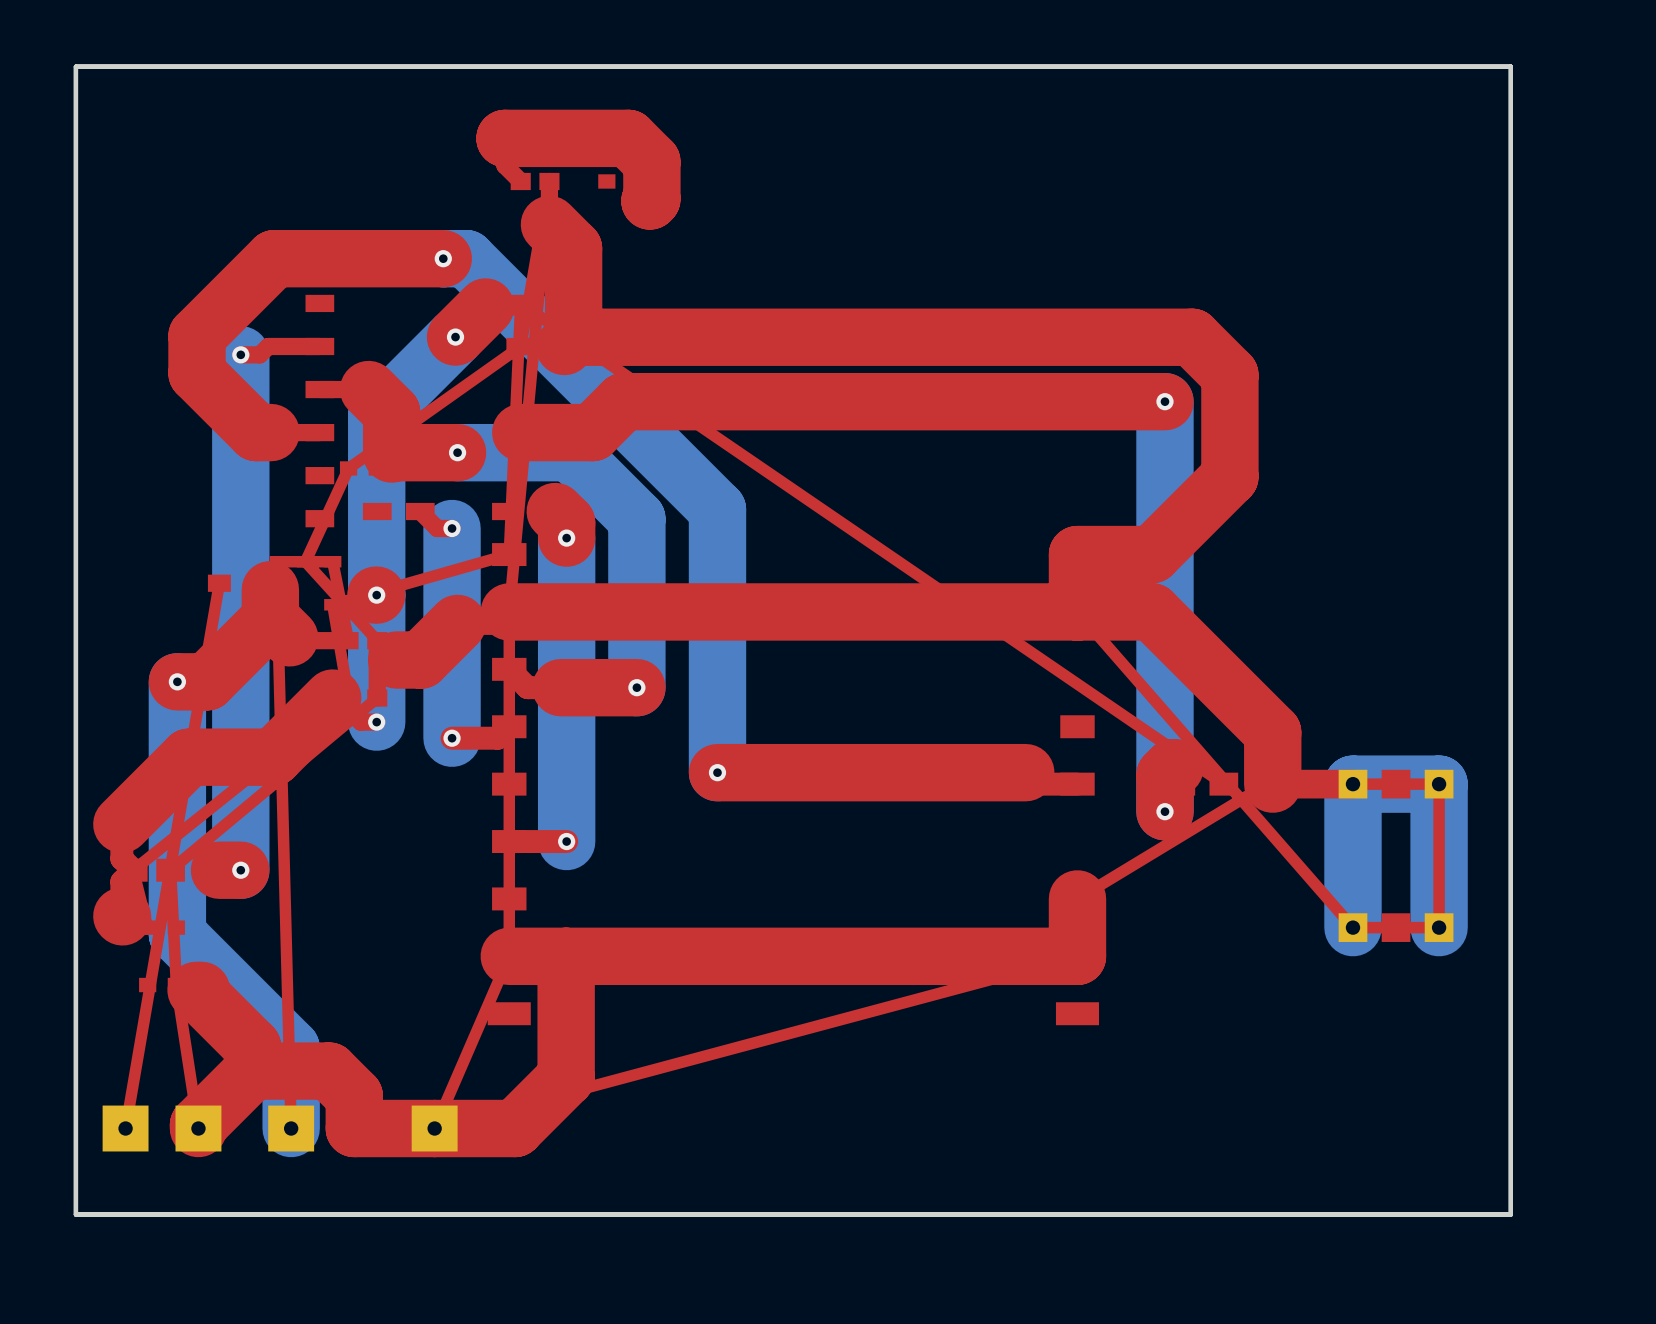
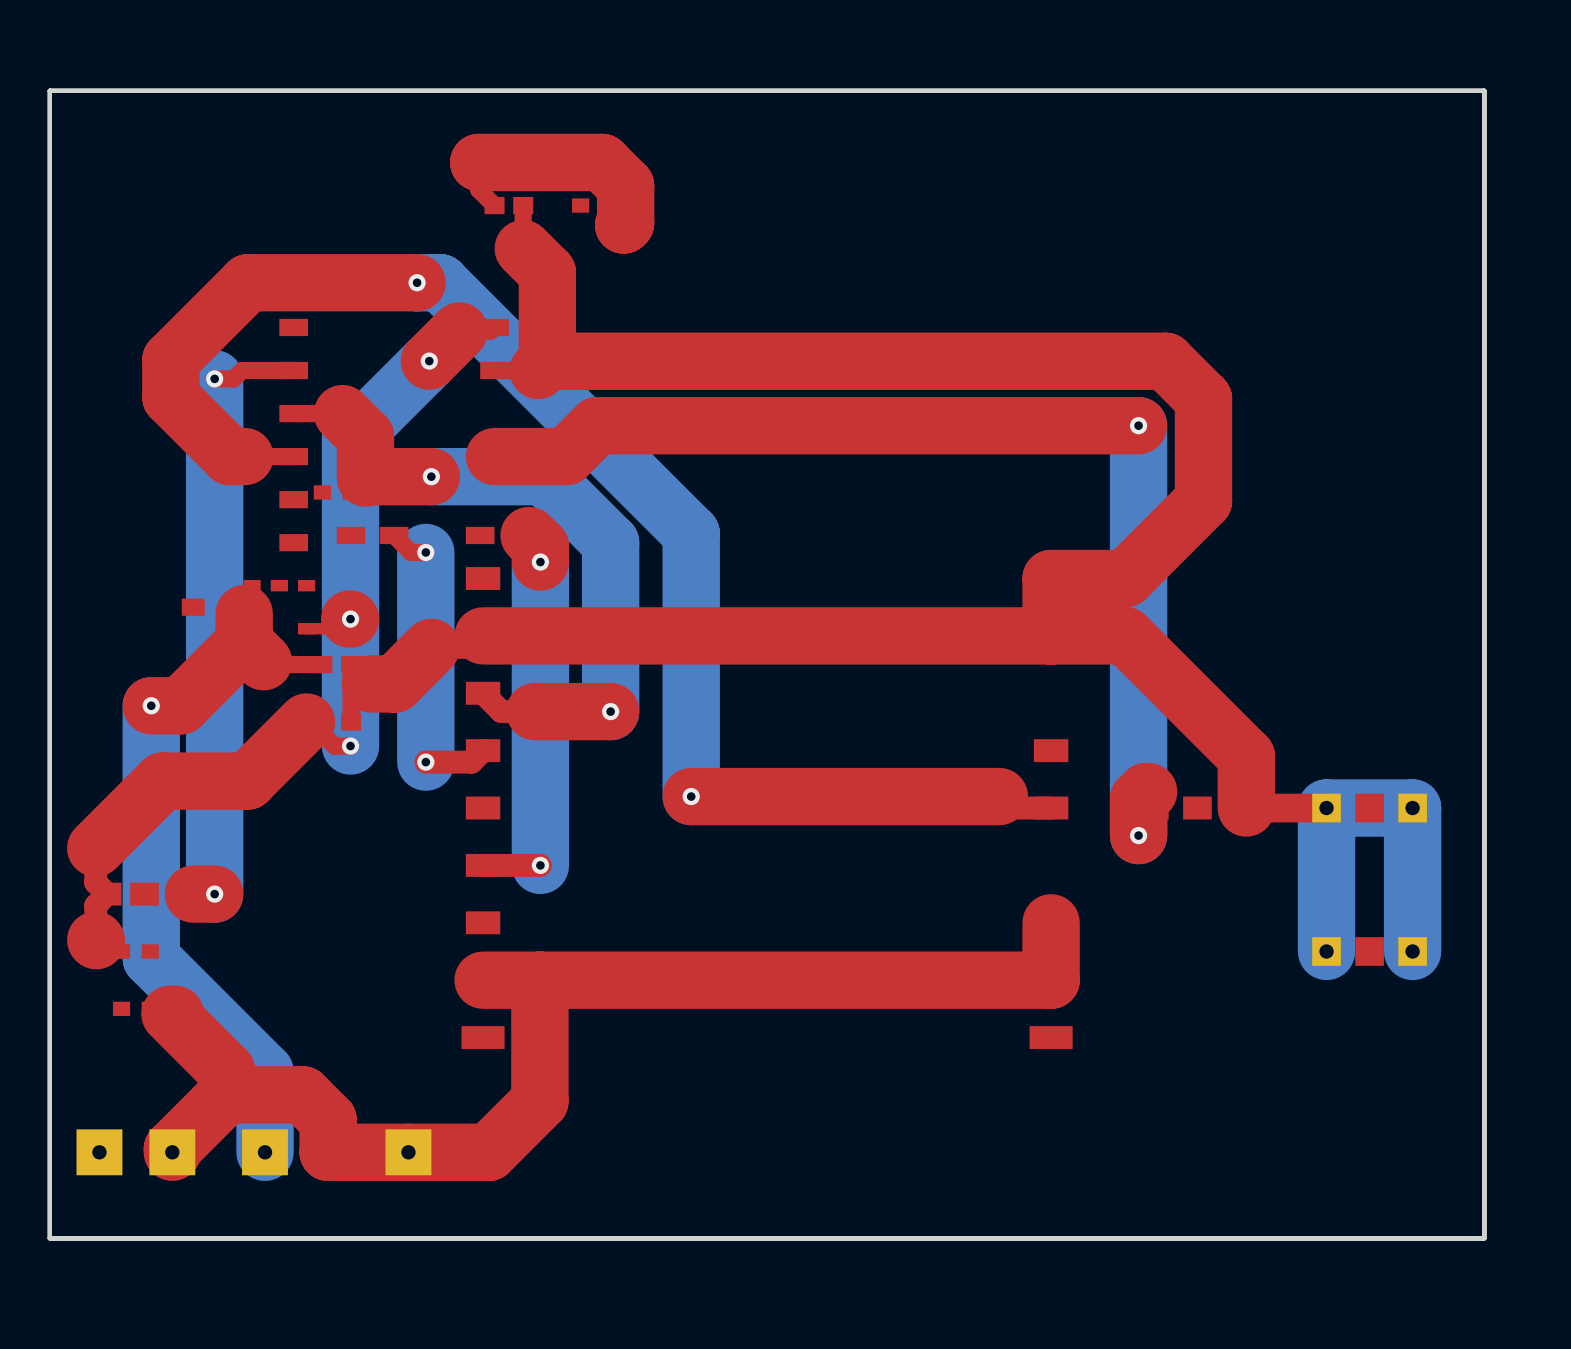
top track: (1077, 554) (1077, 611) (1352, 927) (1439, 927) (1439, 784) (1266, 784) (1077, 898) (1077, 956) (434, 1128) (509, 956) (509, 611) (549, 181) (520, 346) (348, 468) (305, 561) (377, 640) (377, 698) (170, 870) (176, 985) (198, 1128) -> none
top track: (219, 583) (125, 1128) -> none
top track: (348, 640) (332, 561) (278, 561) (276, 583) (291, 1128) -> none
top track: (1223, 784) (520, 303) (509, 554) (332, 604) (348, 698) (133, 870) (147, 927) -> none

